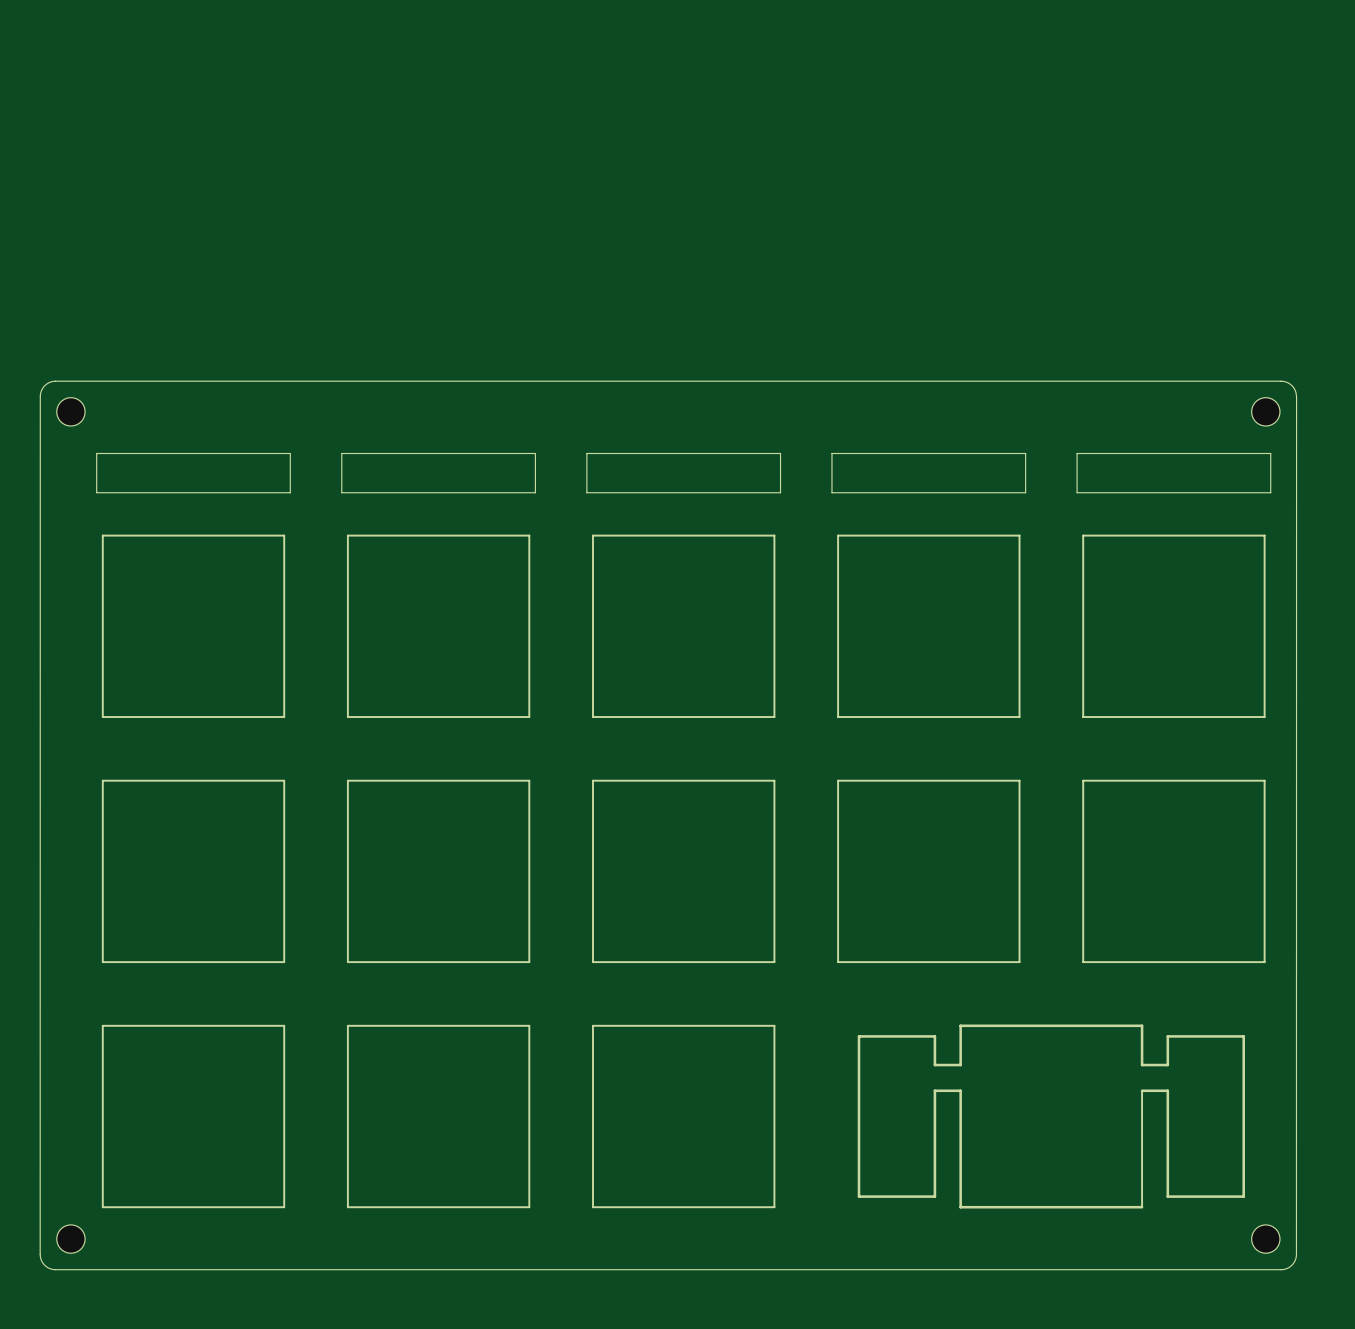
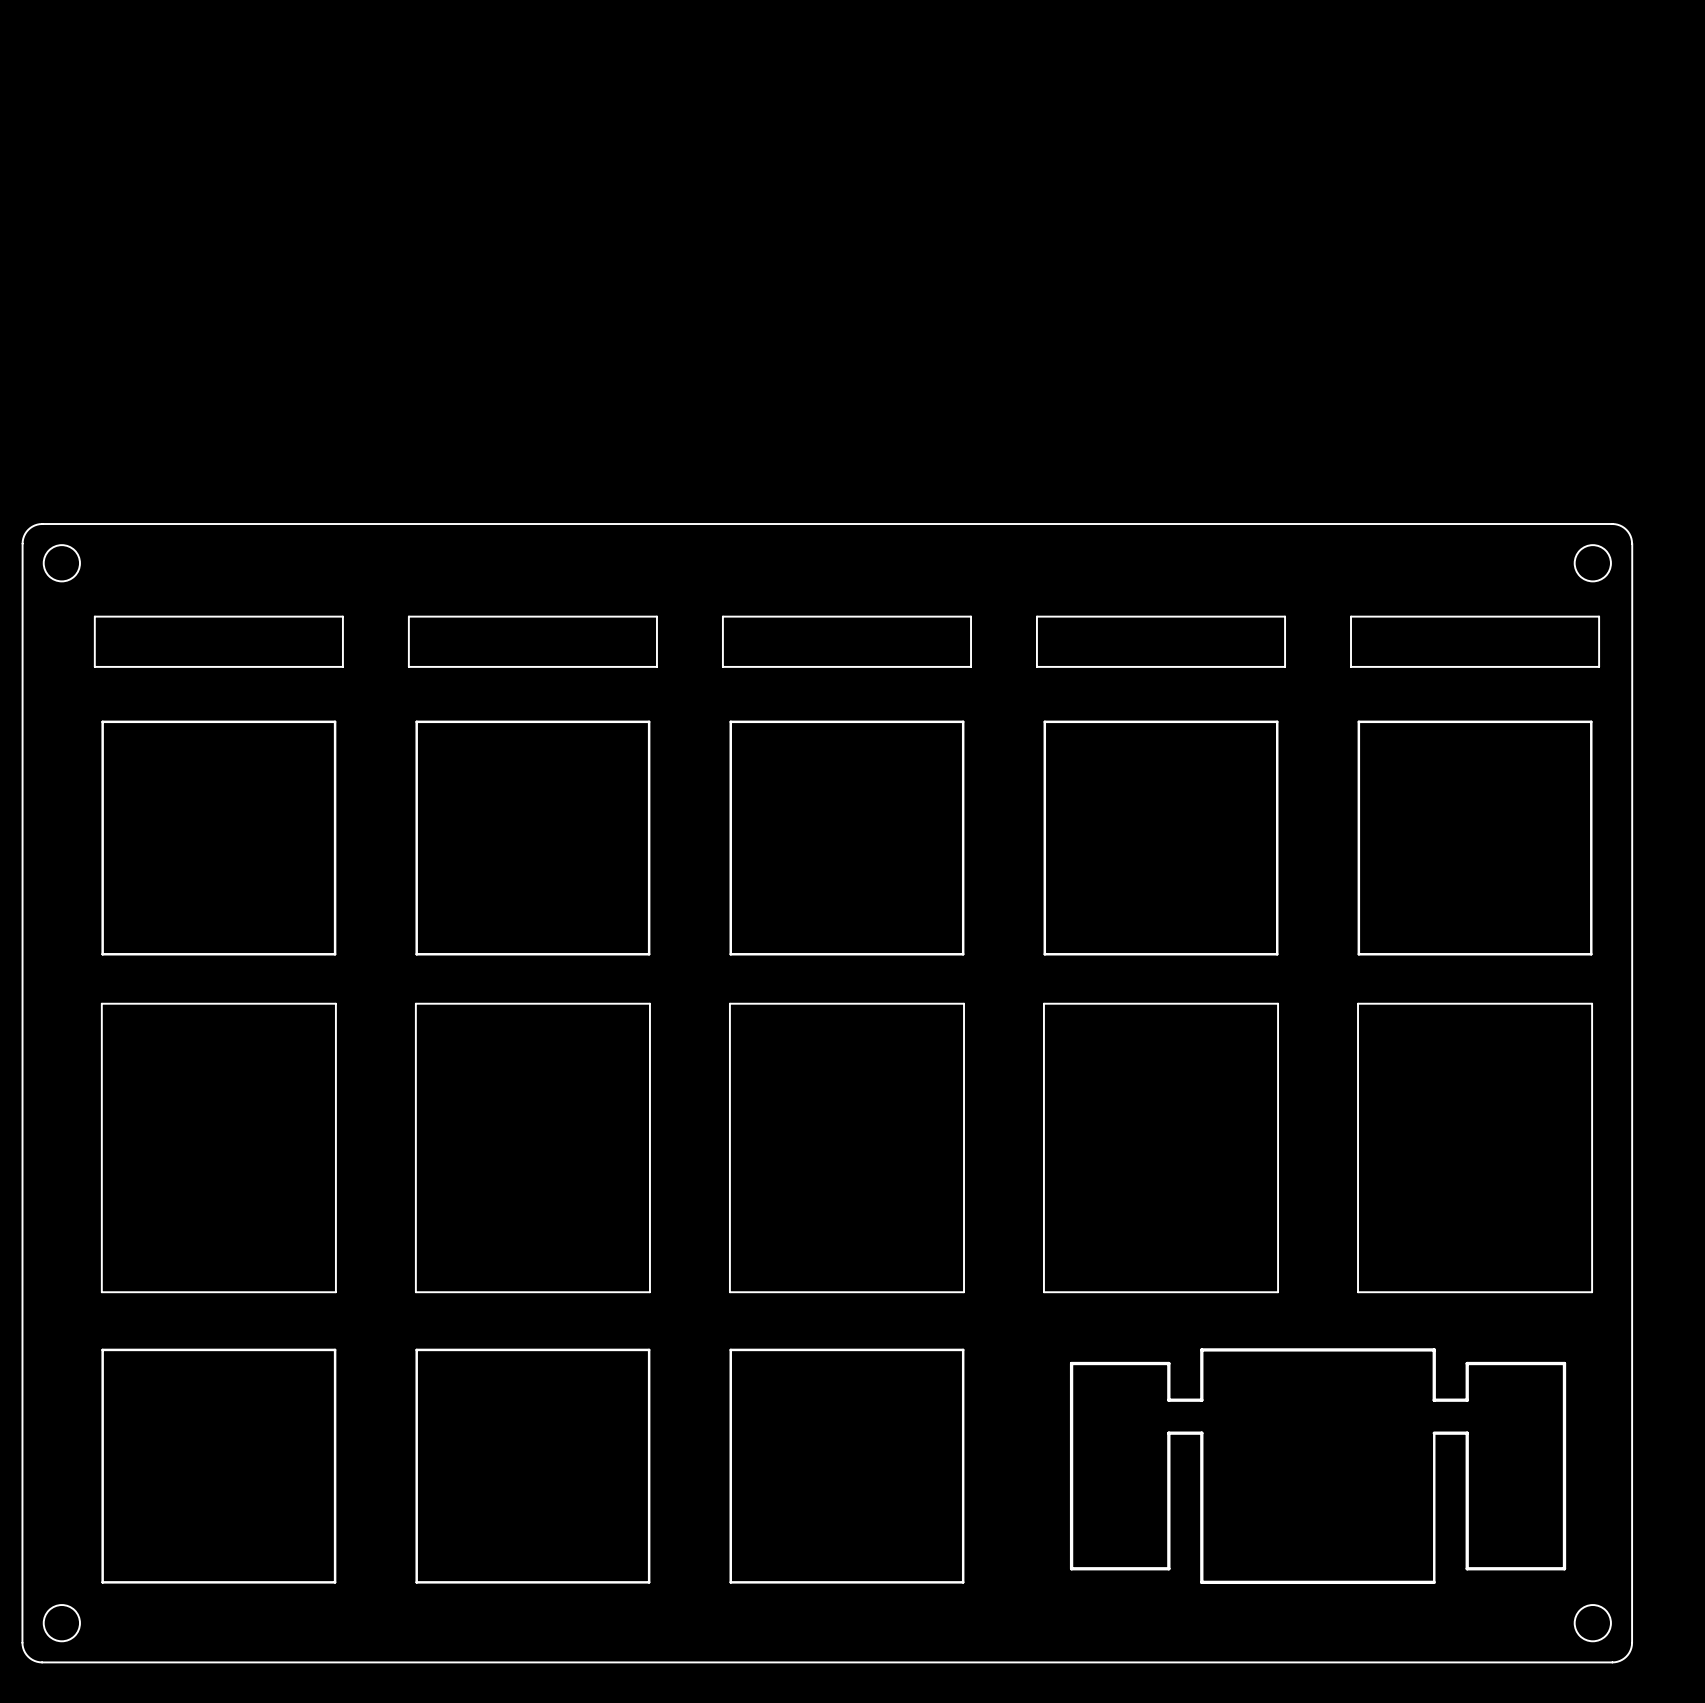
drawing shape: [101, 779, 286, 964] -> [101, 1003, 337, 1293]
drawing shape: [346, 779, 531, 964] -> [415, 1003, 651, 1293]
drawing shape: [592, 779, 776, 964] -> [729, 1003, 965, 1293]
drawing shape: [837, 779, 1021, 964] -> [1043, 1003, 1279, 1293]
drawing shape: [1082, 779, 1266, 964] -> [1357, 1003, 1593, 1293]

